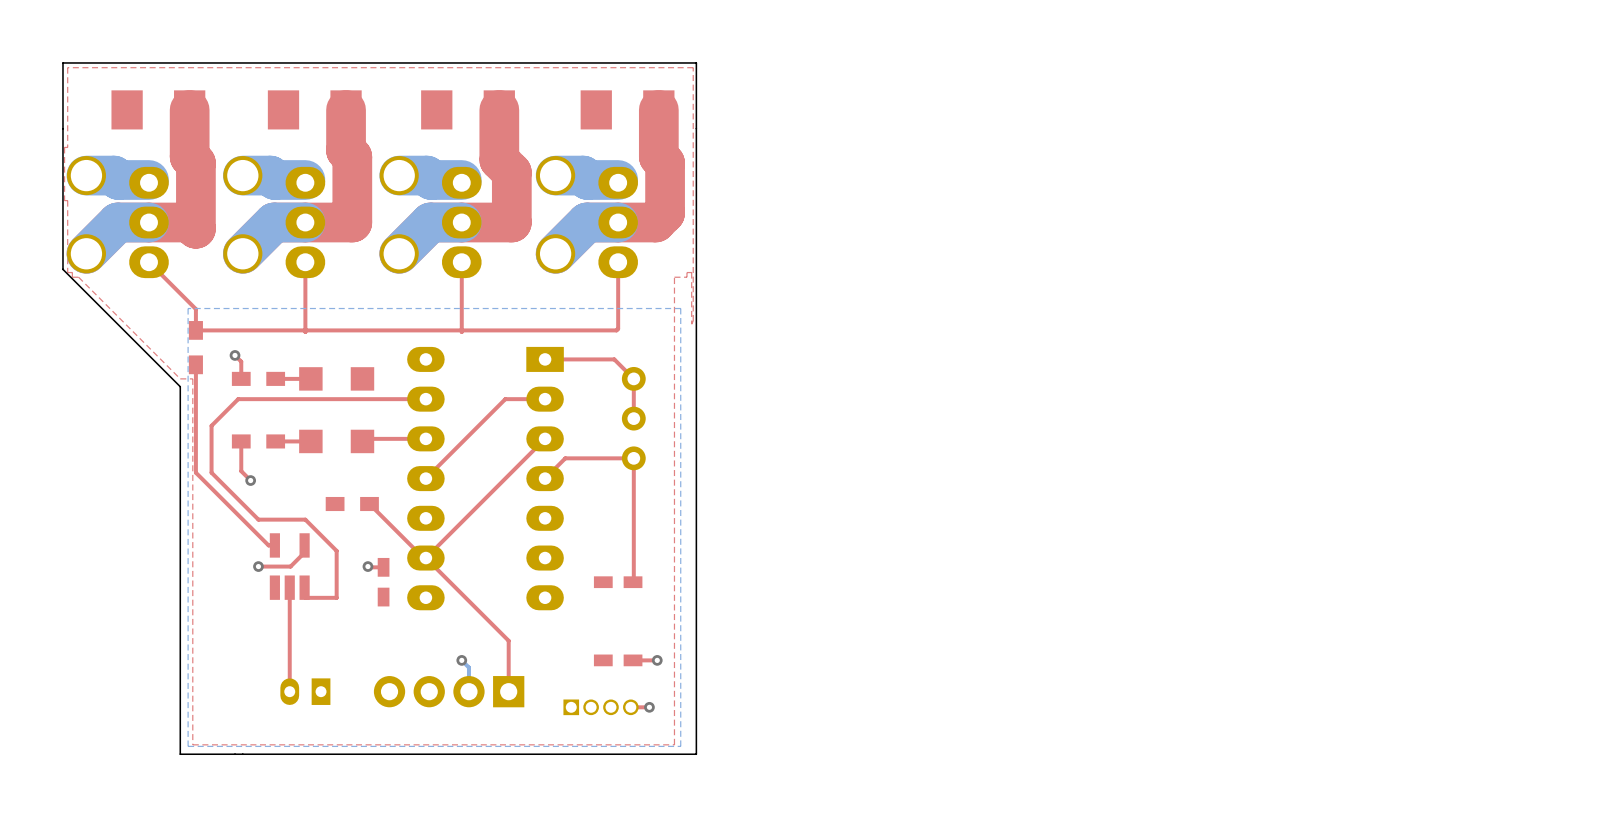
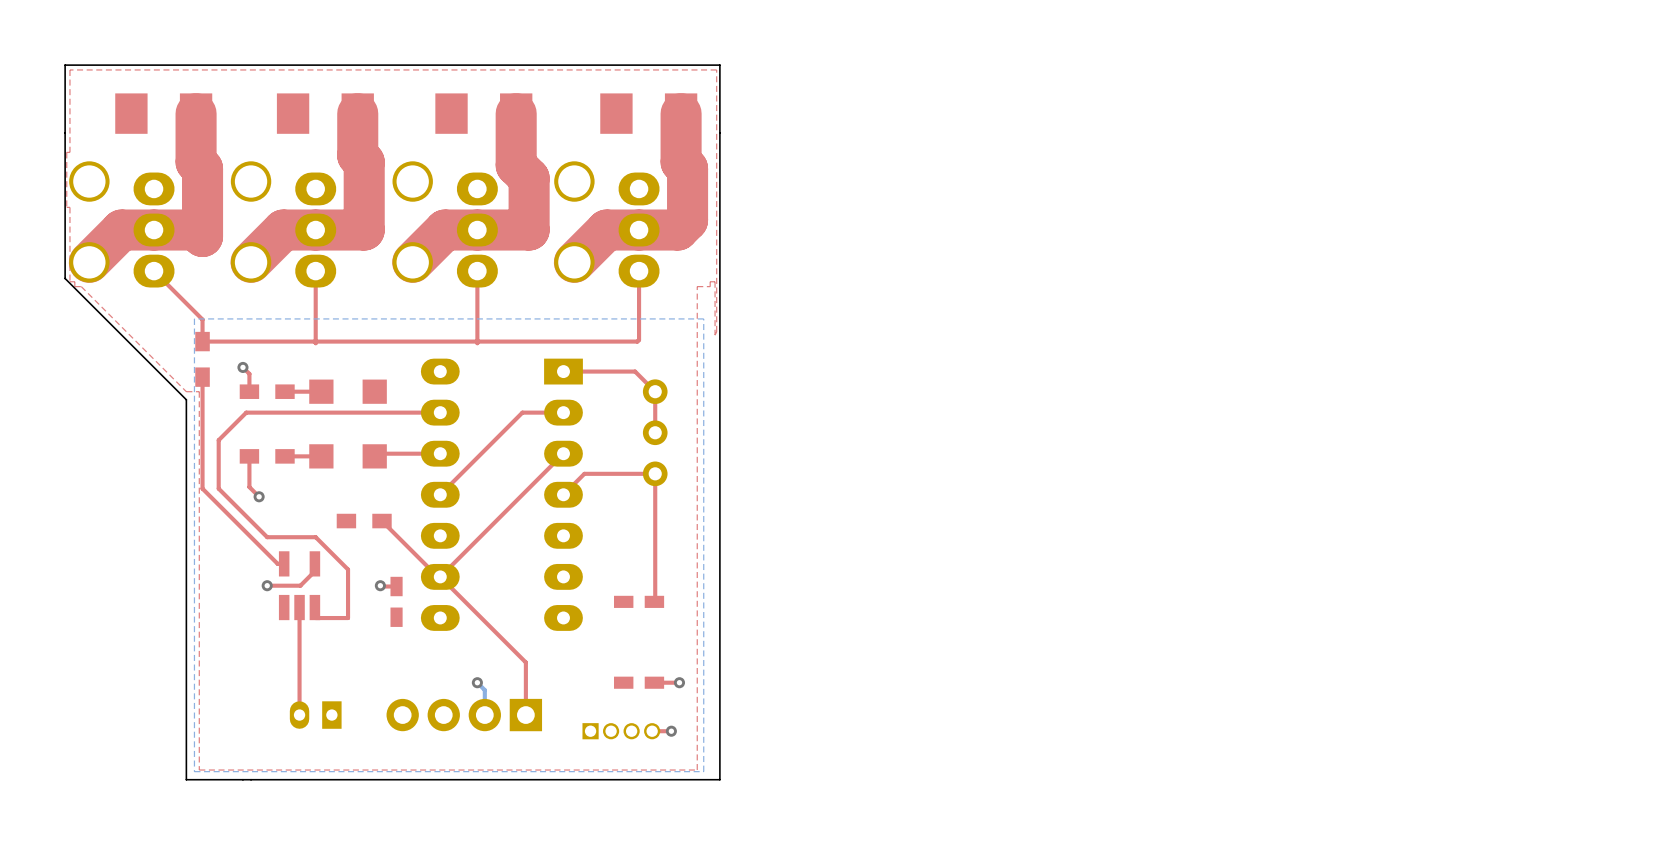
bottom track: (86, 175) (114, 175) (118, 180) (149, 180) -> none
bottom track: (242, 175) (270, 175) (274, 180) (305, 180) -> none
bottom track: (399, 175) (426, 175) (431, 180) (461, 180) -> none
bottom track: (555, 175) (583, 175) (587, 180) (618, 180) -> none
bottom track: (149, 222) (117, 222) (86, 253) -> none
bottom track: (305, 222) (274, 222) (242, 253) -> none
bottom track: (461, 222) (430, 222) (399, 253) -> none
bottom track: (618, 222) (586, 222) (555, 253) -> none

